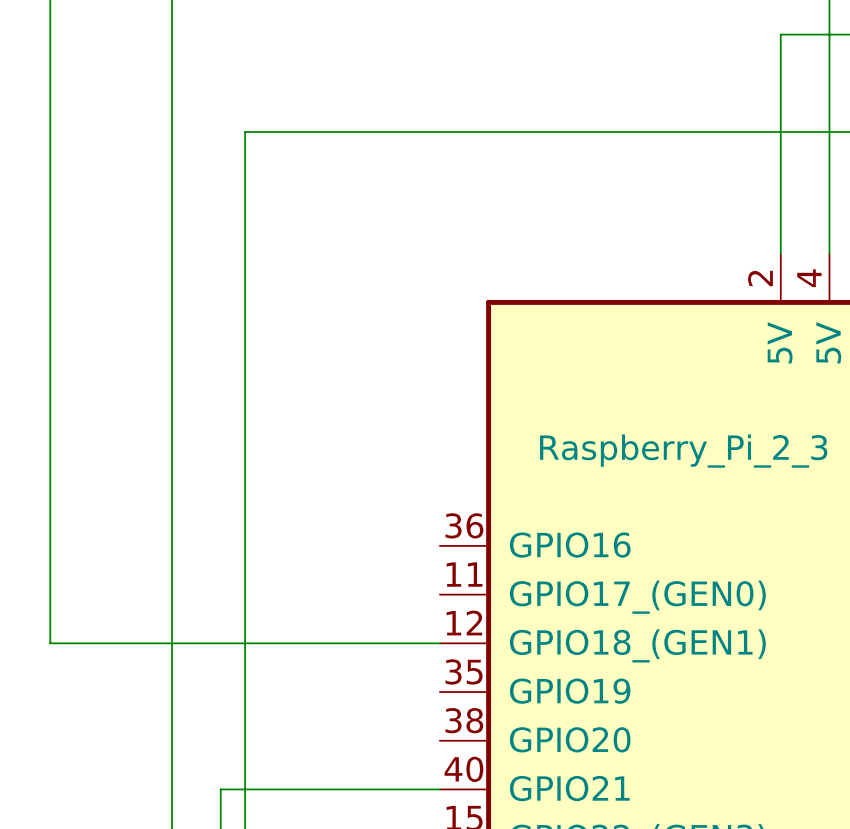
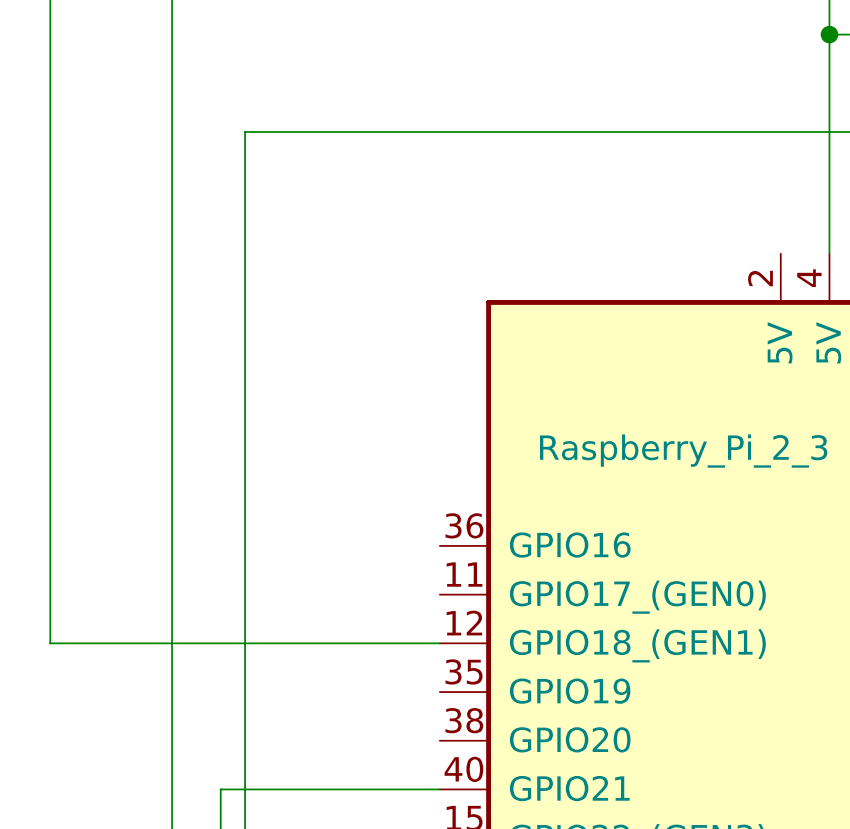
wire: (829, 34) (780, 34) (780, 253) -> none
junction: none -> (829, 34)

